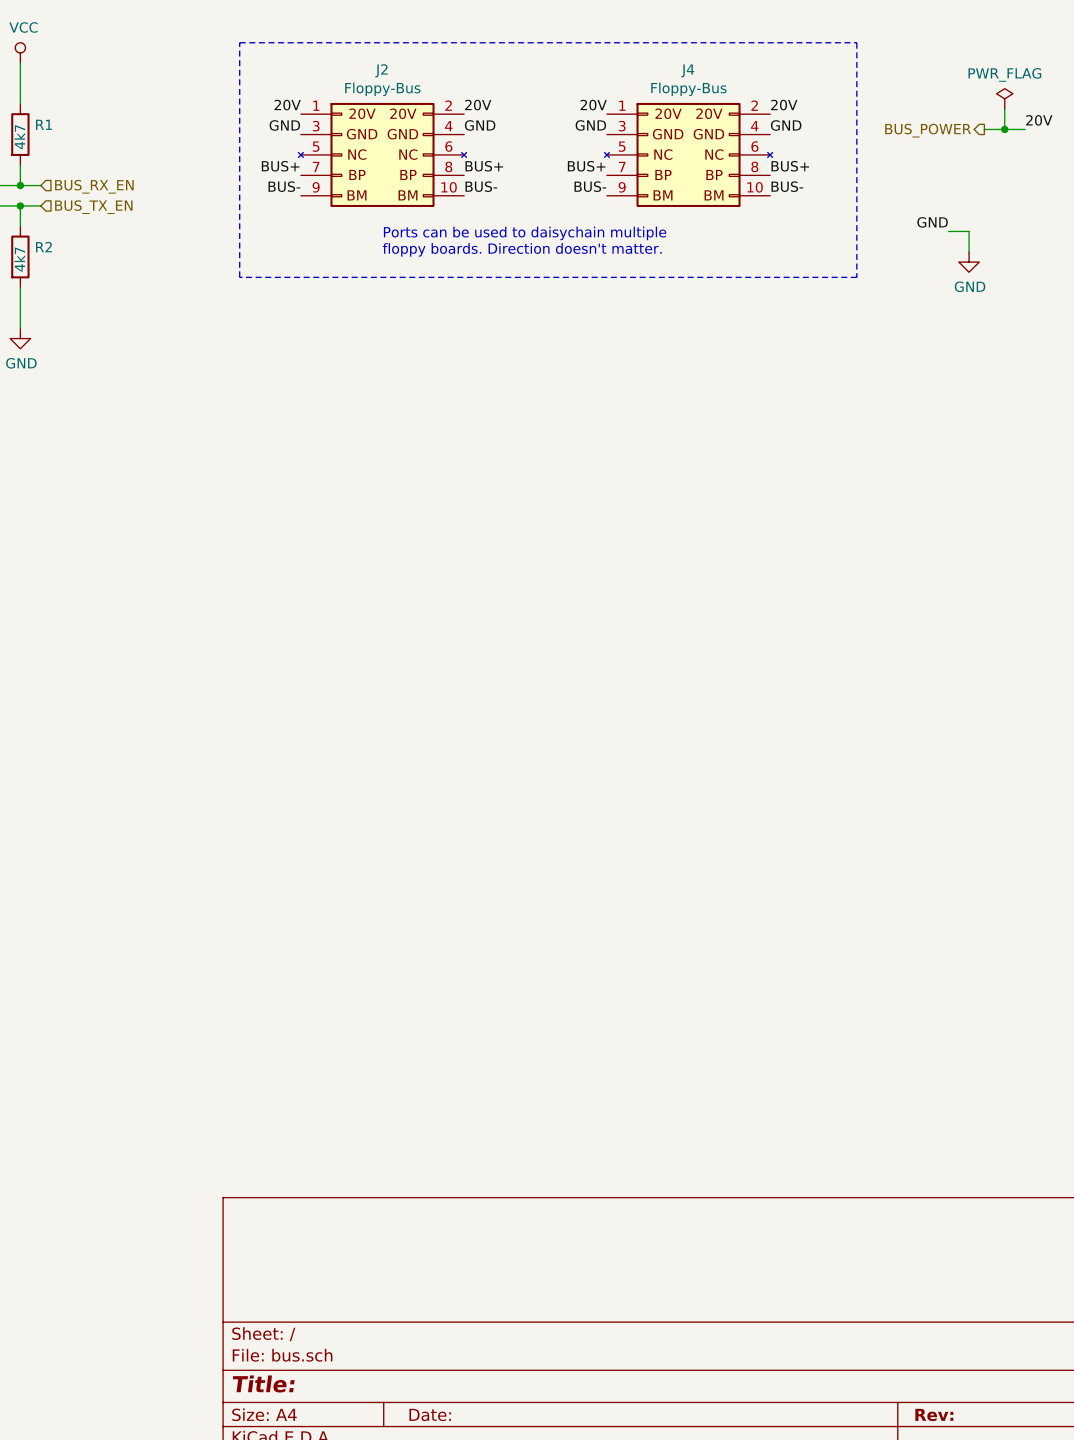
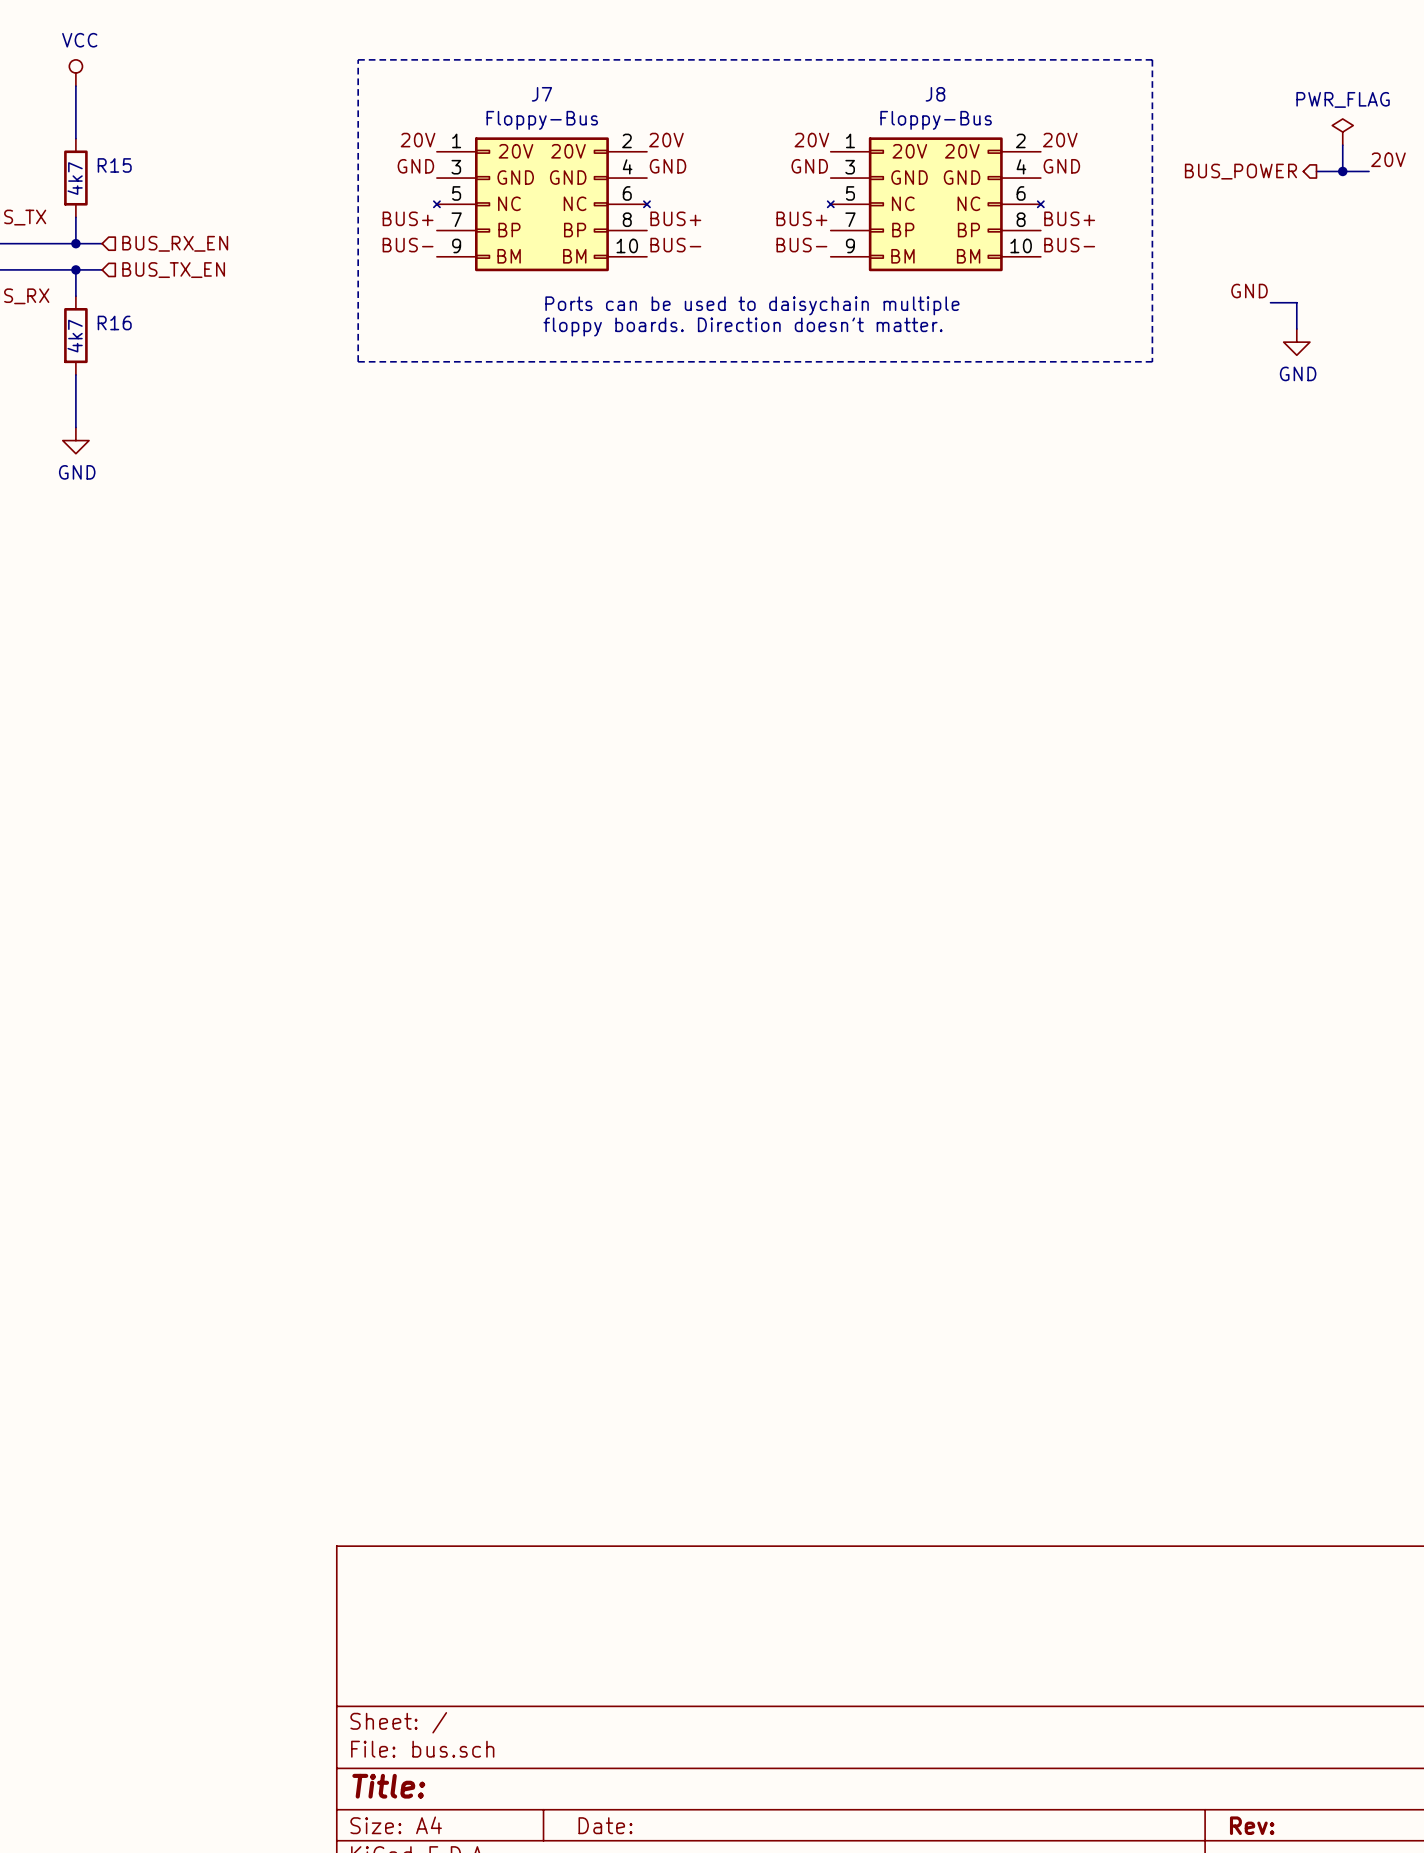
J2 name: J2 (381, 70) -> J7 (541, 94)
J4 name: J4 (687, 70) -> J8 (935, 94)
R1 name: R1 (44, 124) -> R15 (114, 165)
R2 name: R2 (43, 247) -> R16 (114, 323)

